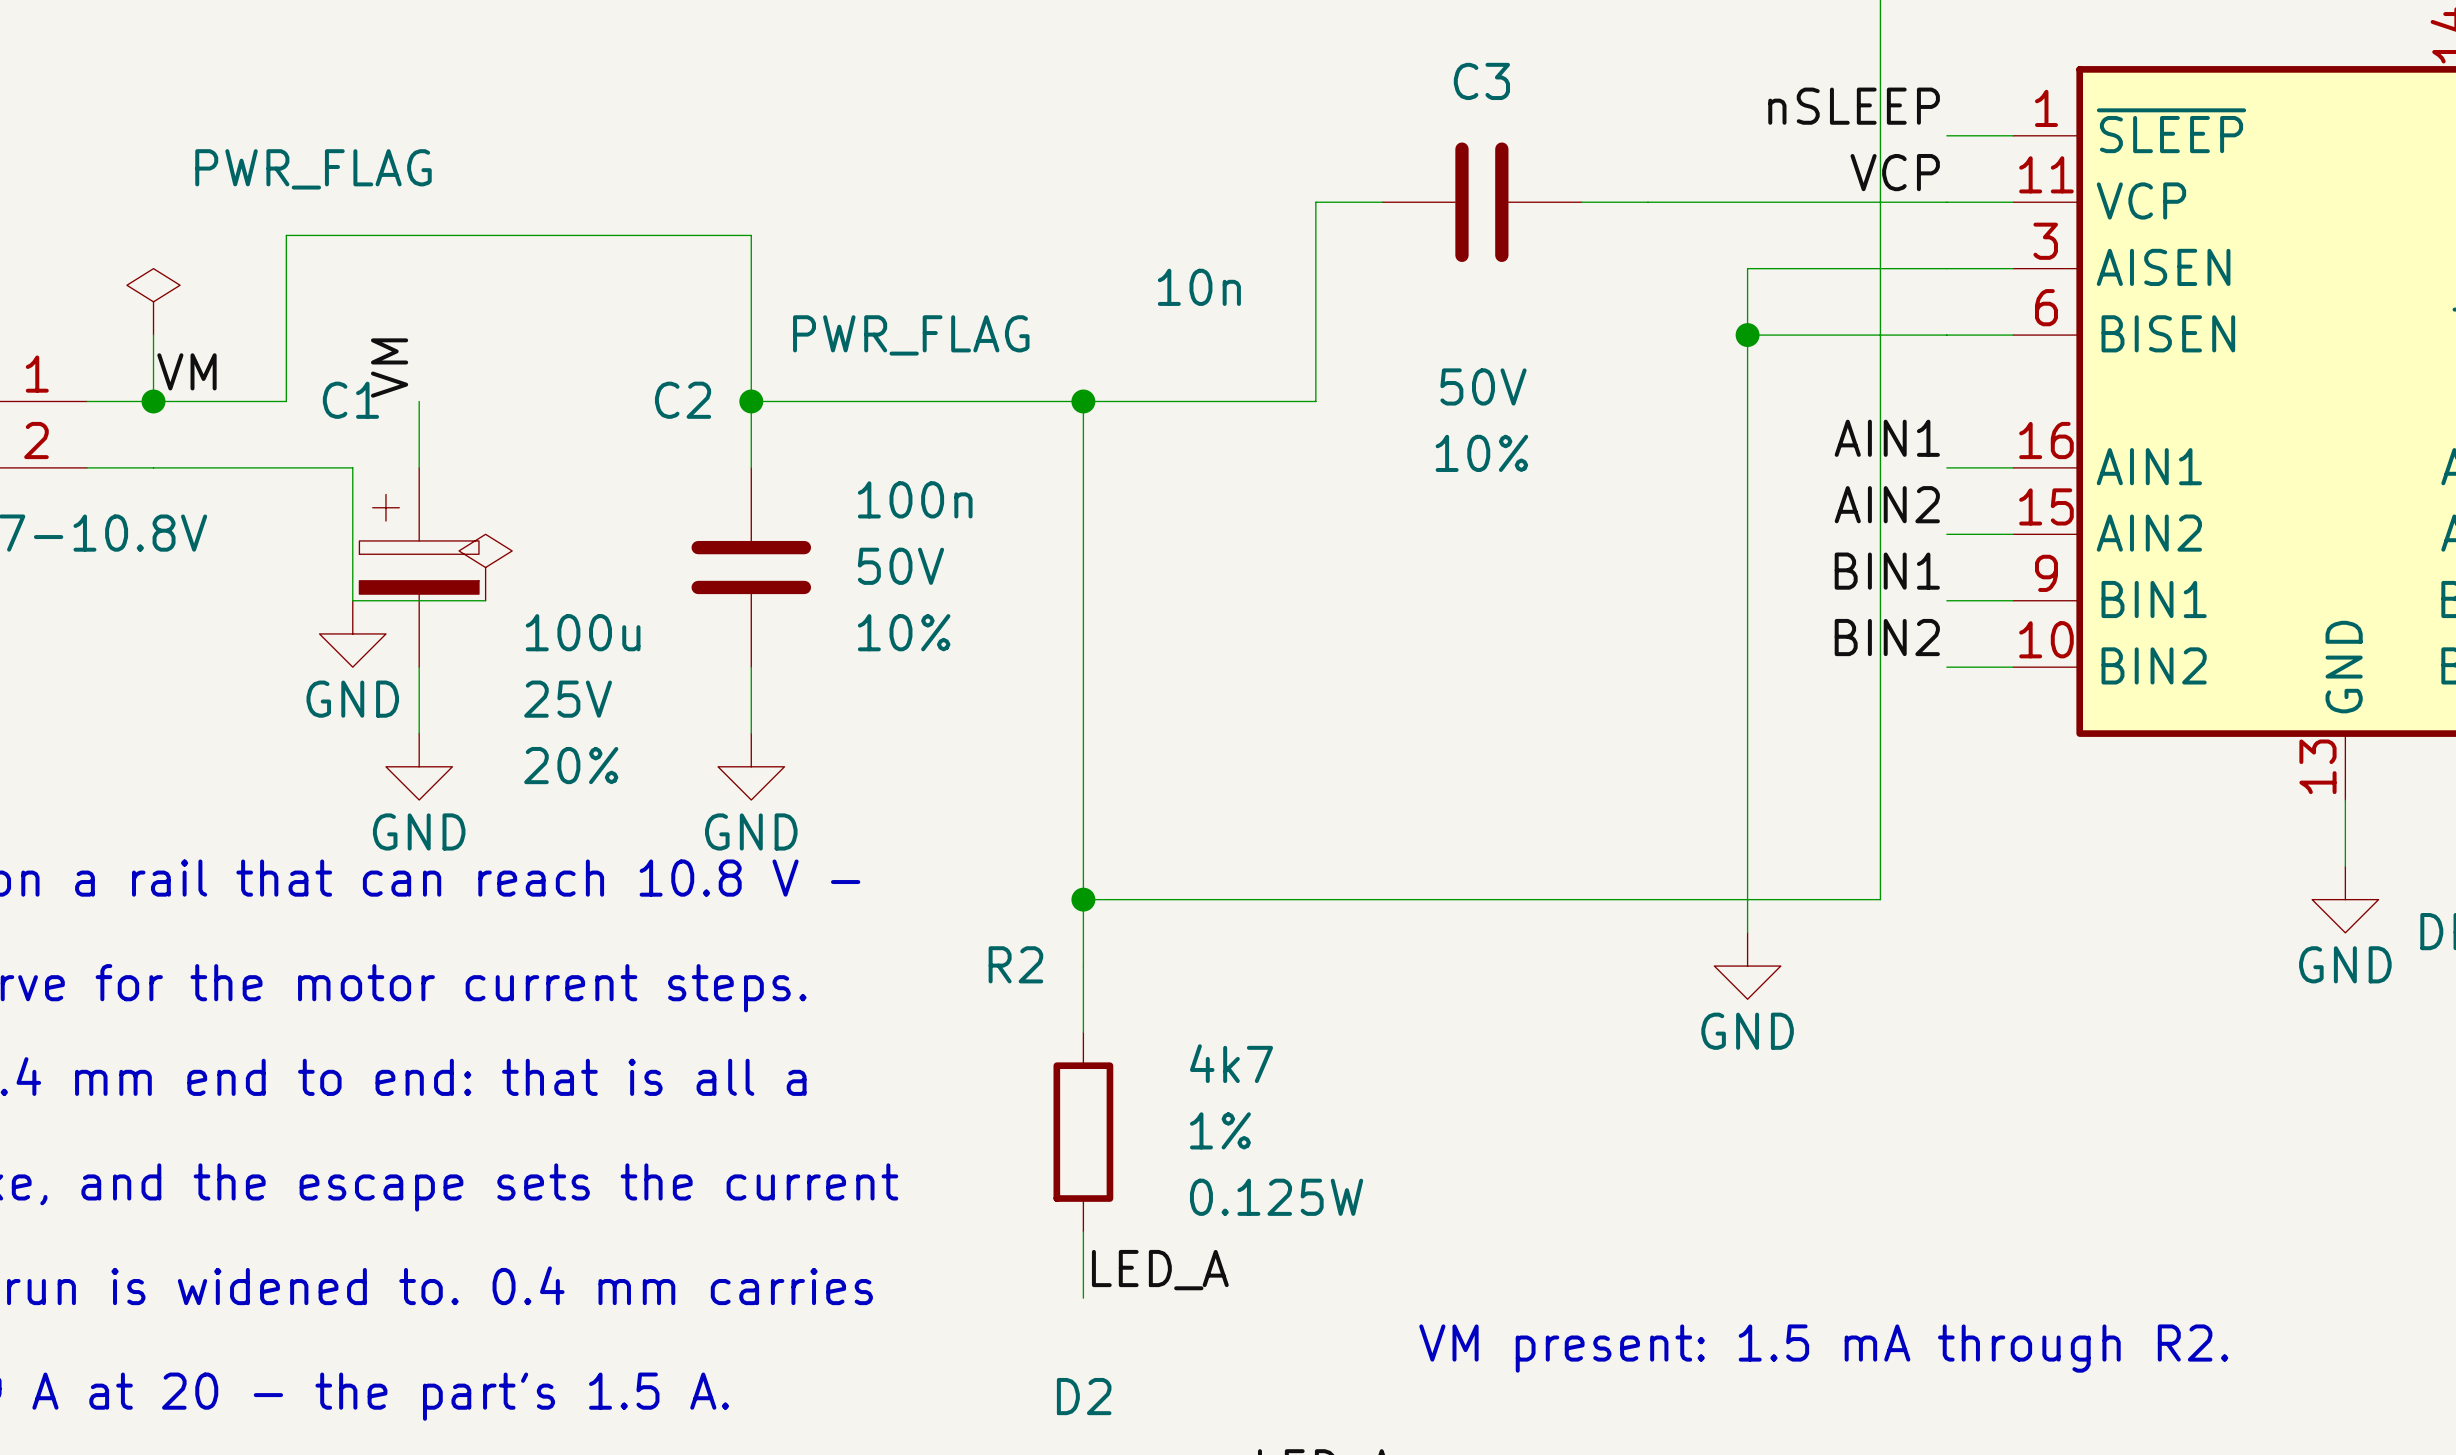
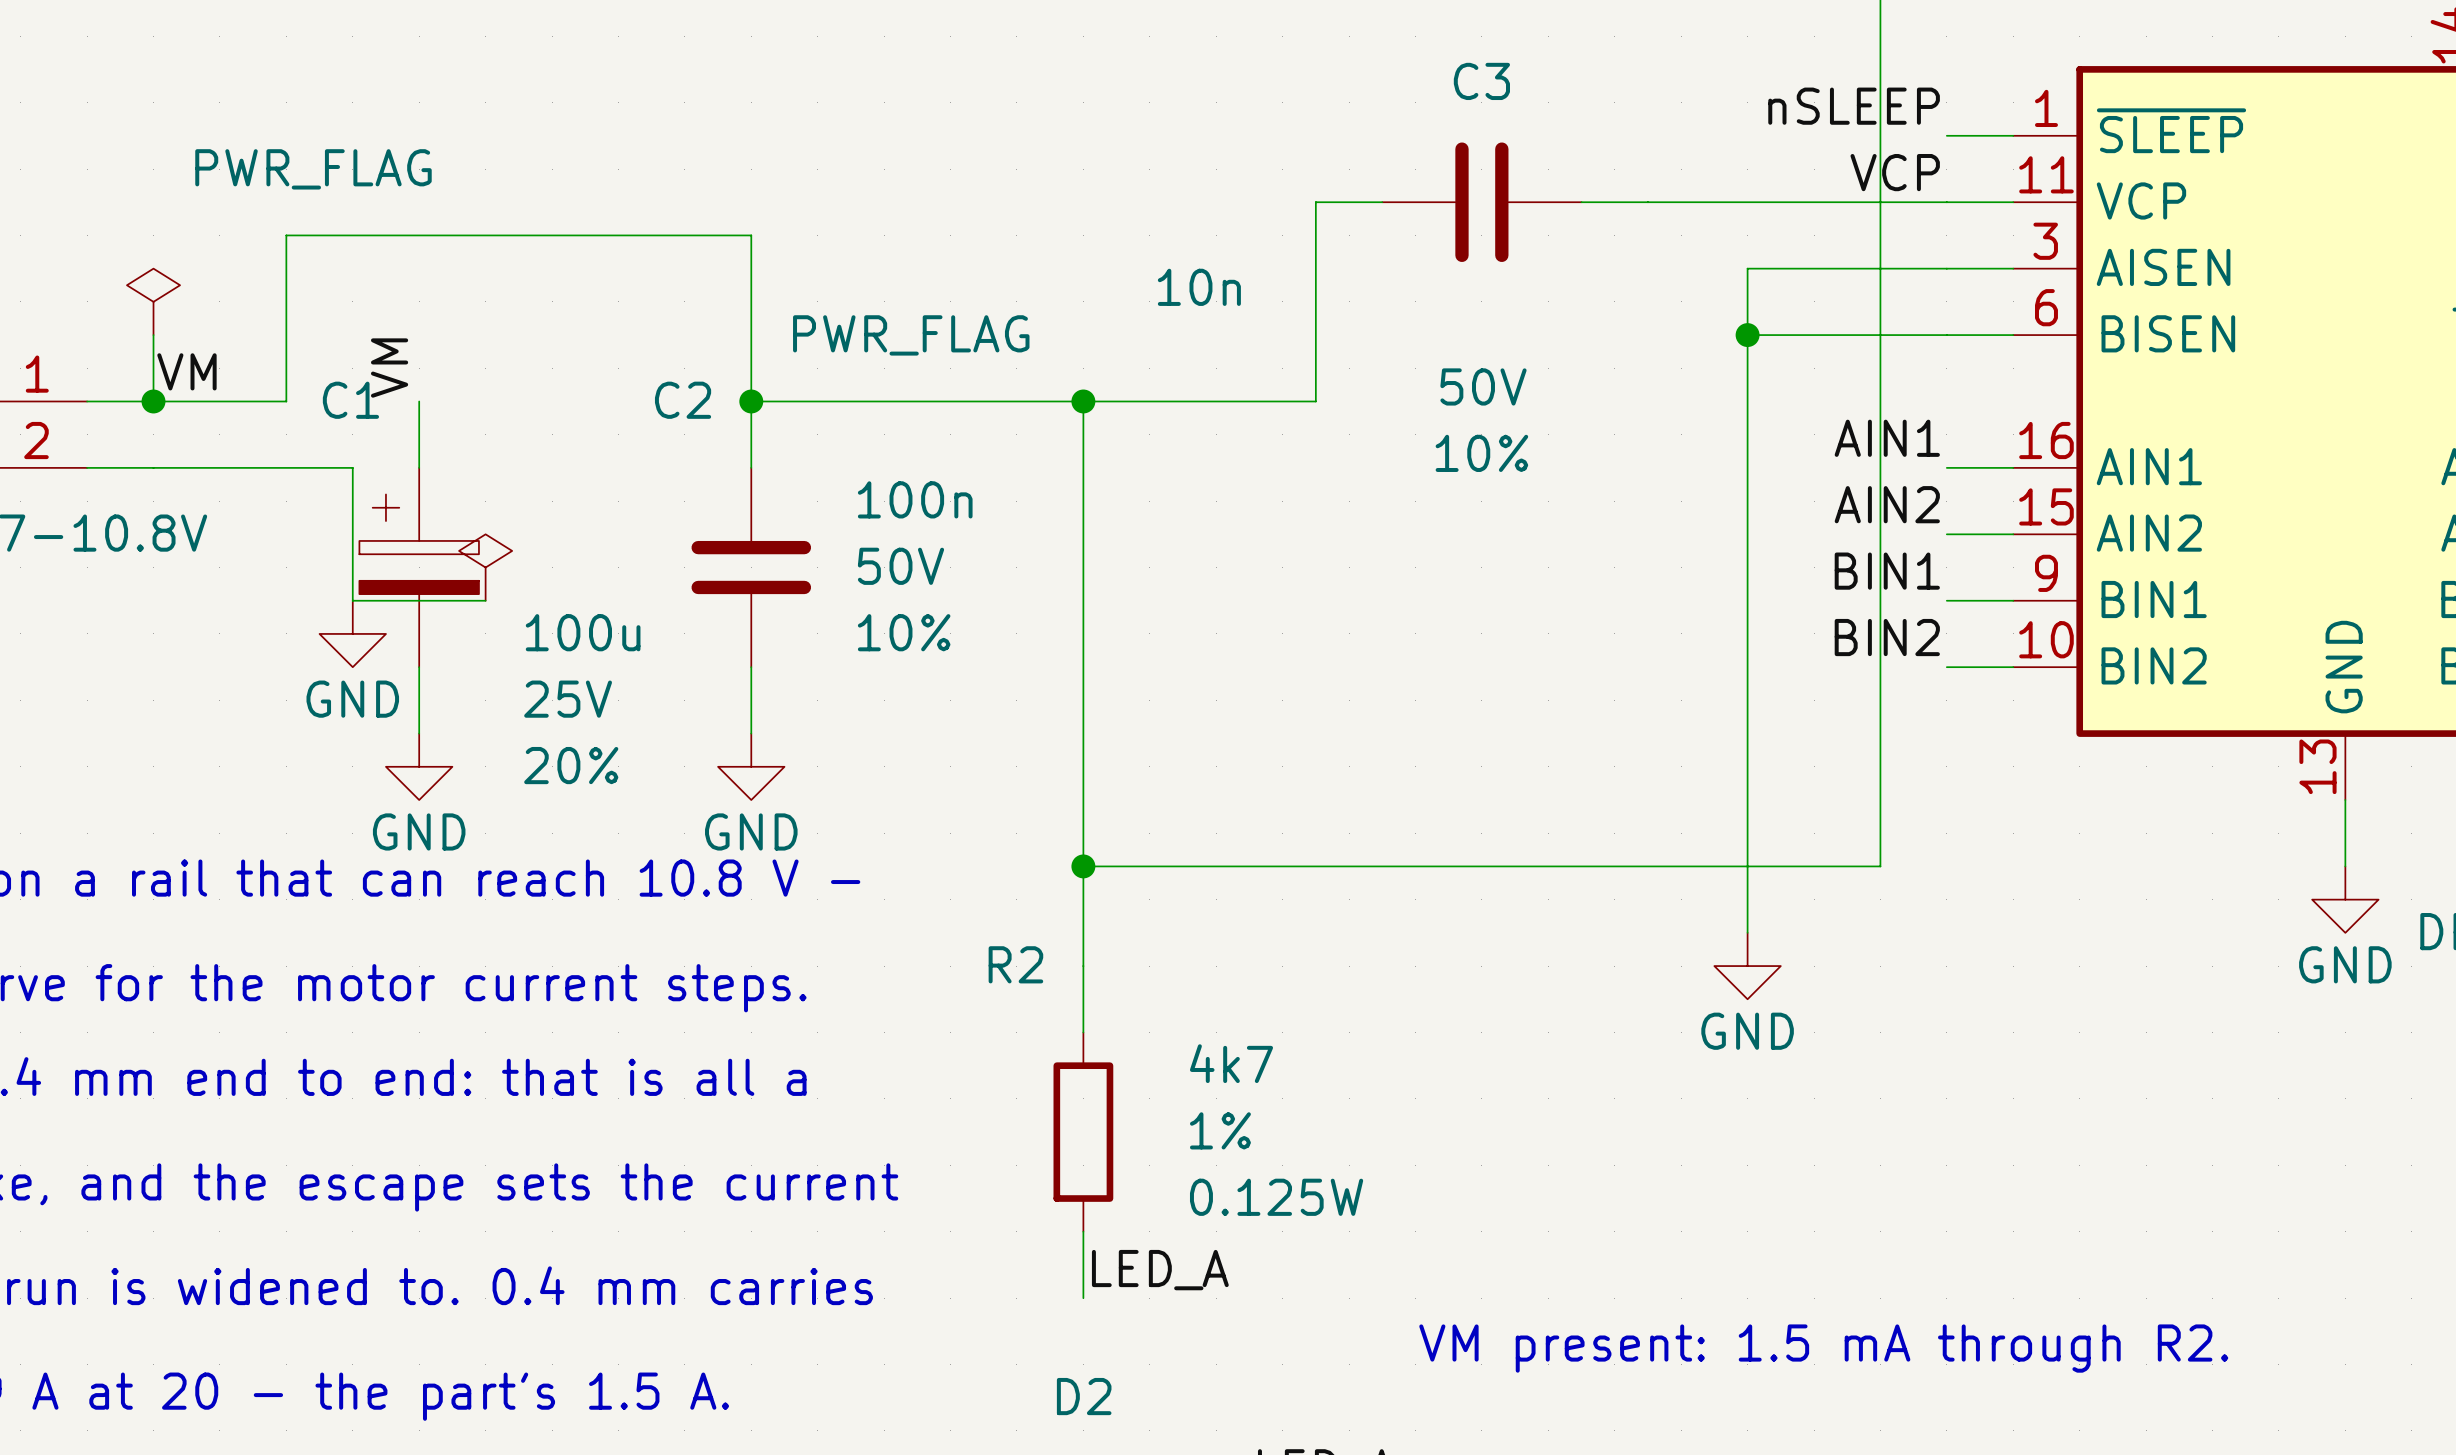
wire: (1880, 866) (1880, 899) (1083, 899) -> (1880, 866) (1083, 866)
junction position: (1083, 899) -> (1083, 866)

